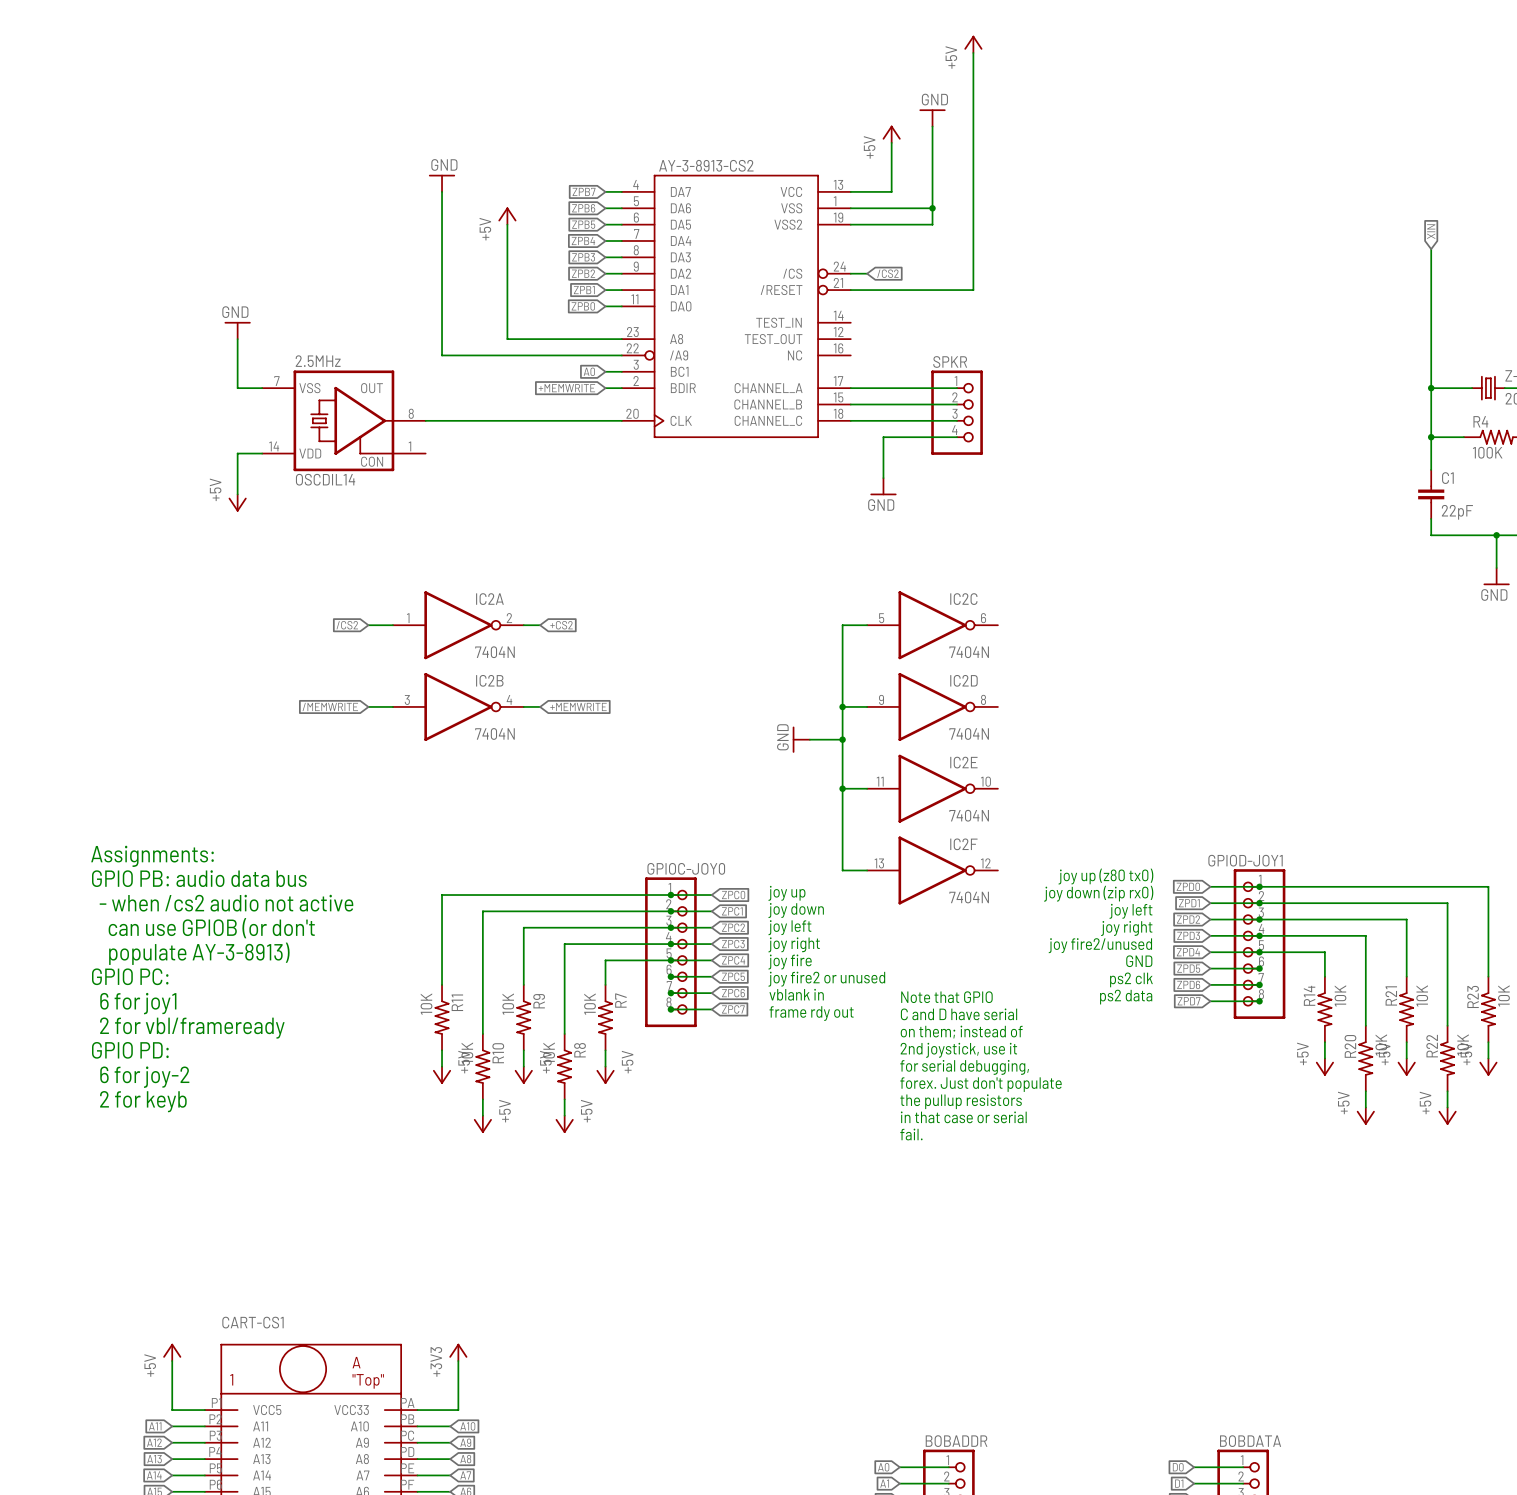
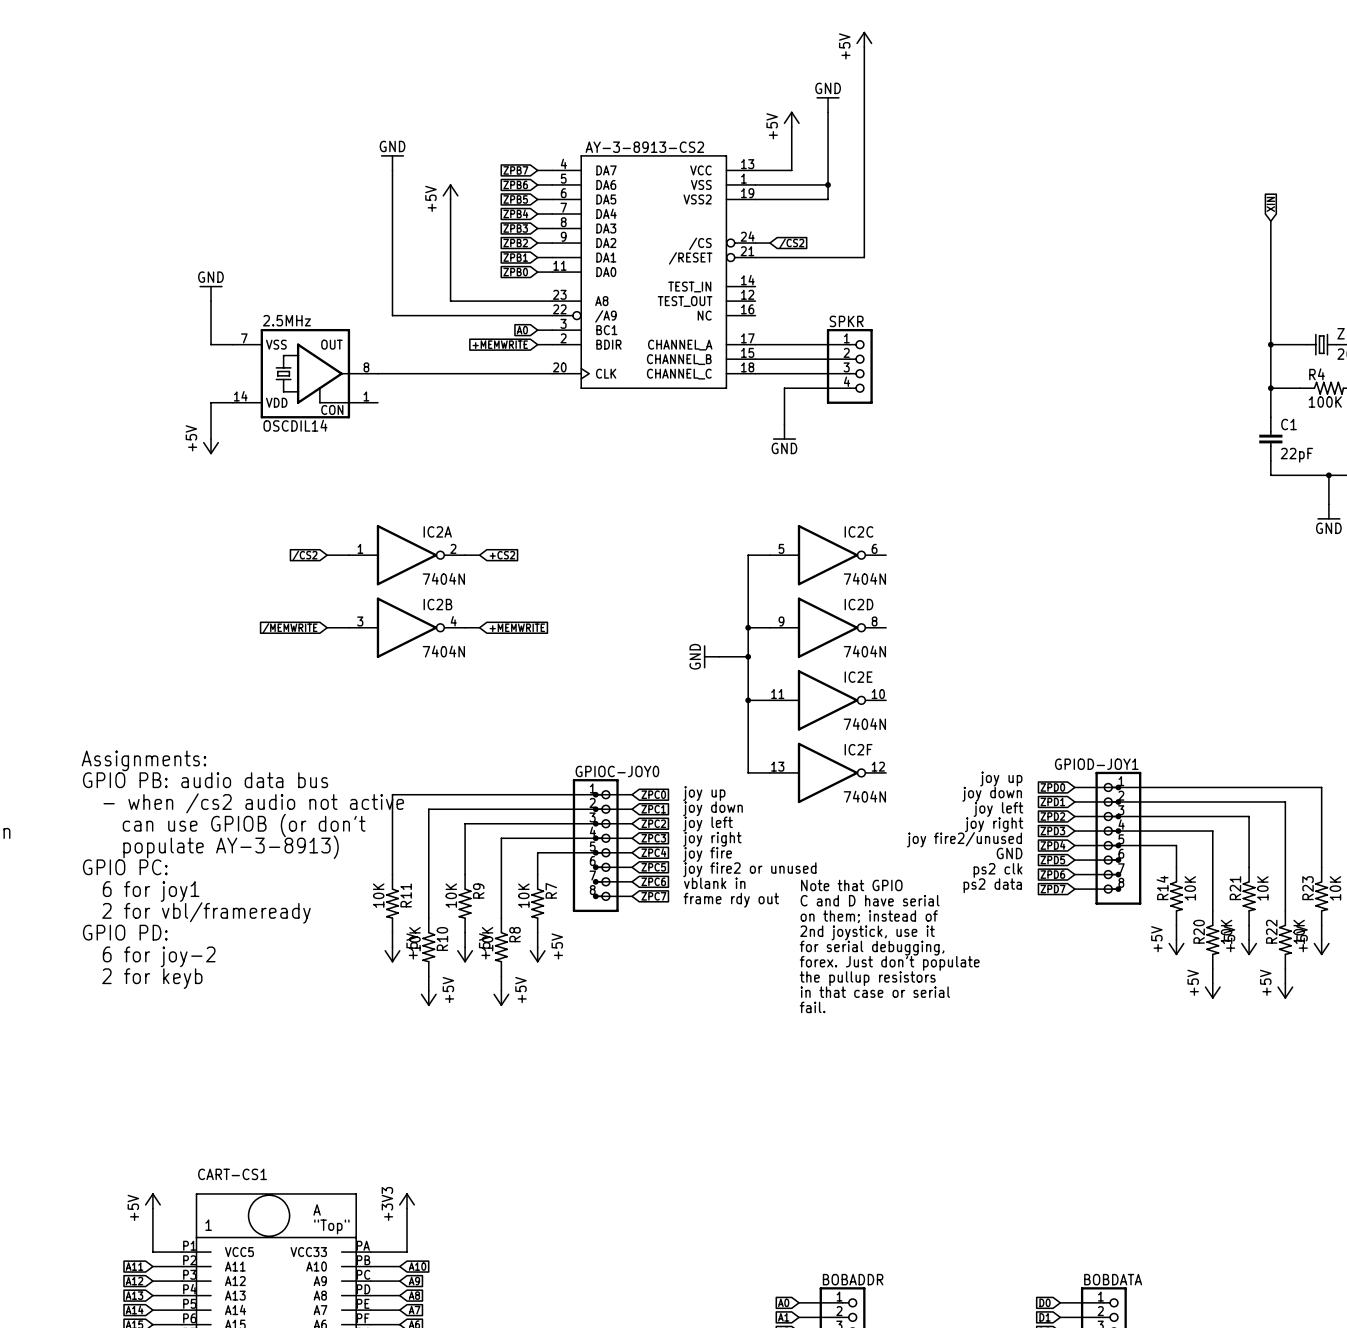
text: joy up (z80 tx0) (1105, 876) -> joy up (1001, 778)
text: joy down (zip rx0) (1098, 893) -> joy down (992, 794)

